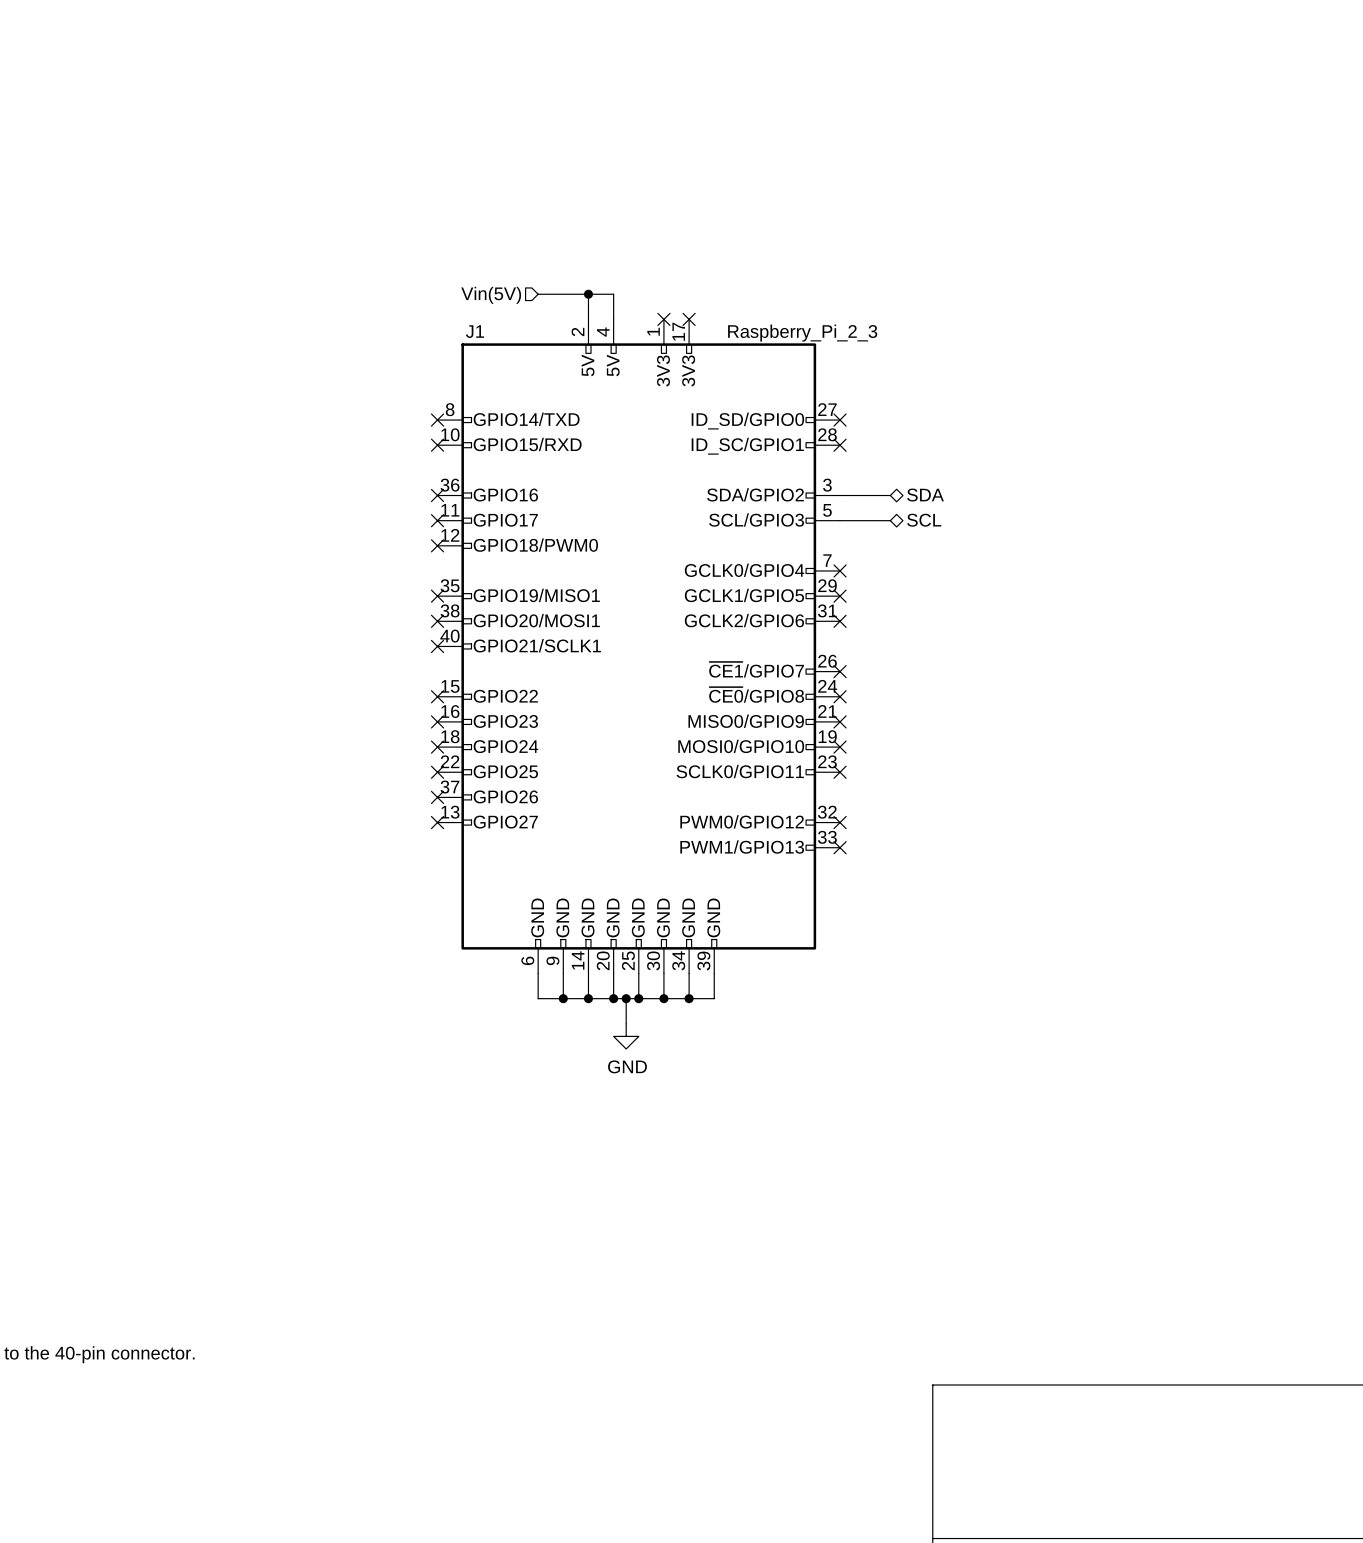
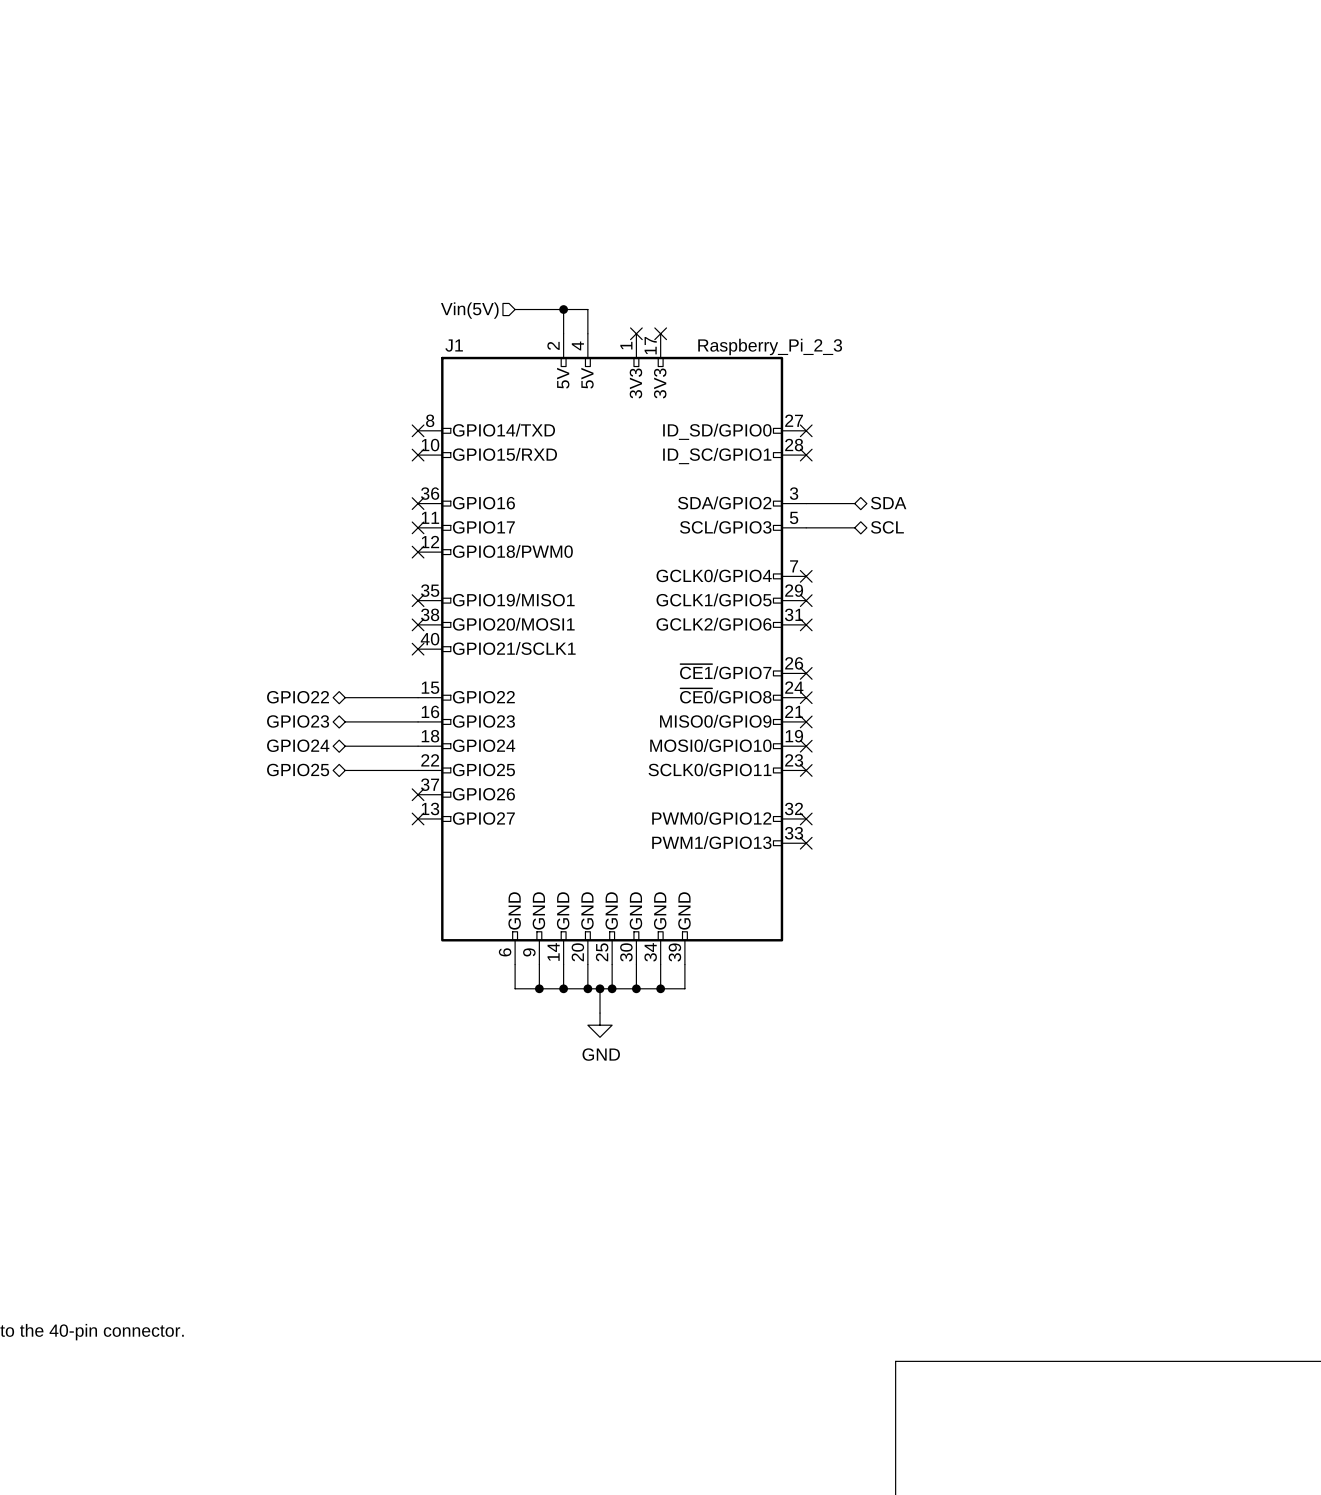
hierarchical label: none -> GPIO22 (298, 697)
wire: none -> (345, 697) (418, 697)
no-connect mark: (437, 696) -> none
hierarchical label: none -> GPIO23 (298, 721)
wire: none -> (345, 721) (418, 721)
no-connect mark: (437, 721) -> none
hierarchical label: none -> GPIO24 (298, 745)
wire: none -> (345, 746) (418, 746)
no-connect mark: (437, 747) -> none
hierarchical label: none -> GPIO25 (298, 770)
wire: none -> (345, 770) (418, 770)
no-connect mark: (437, 772) -> none

